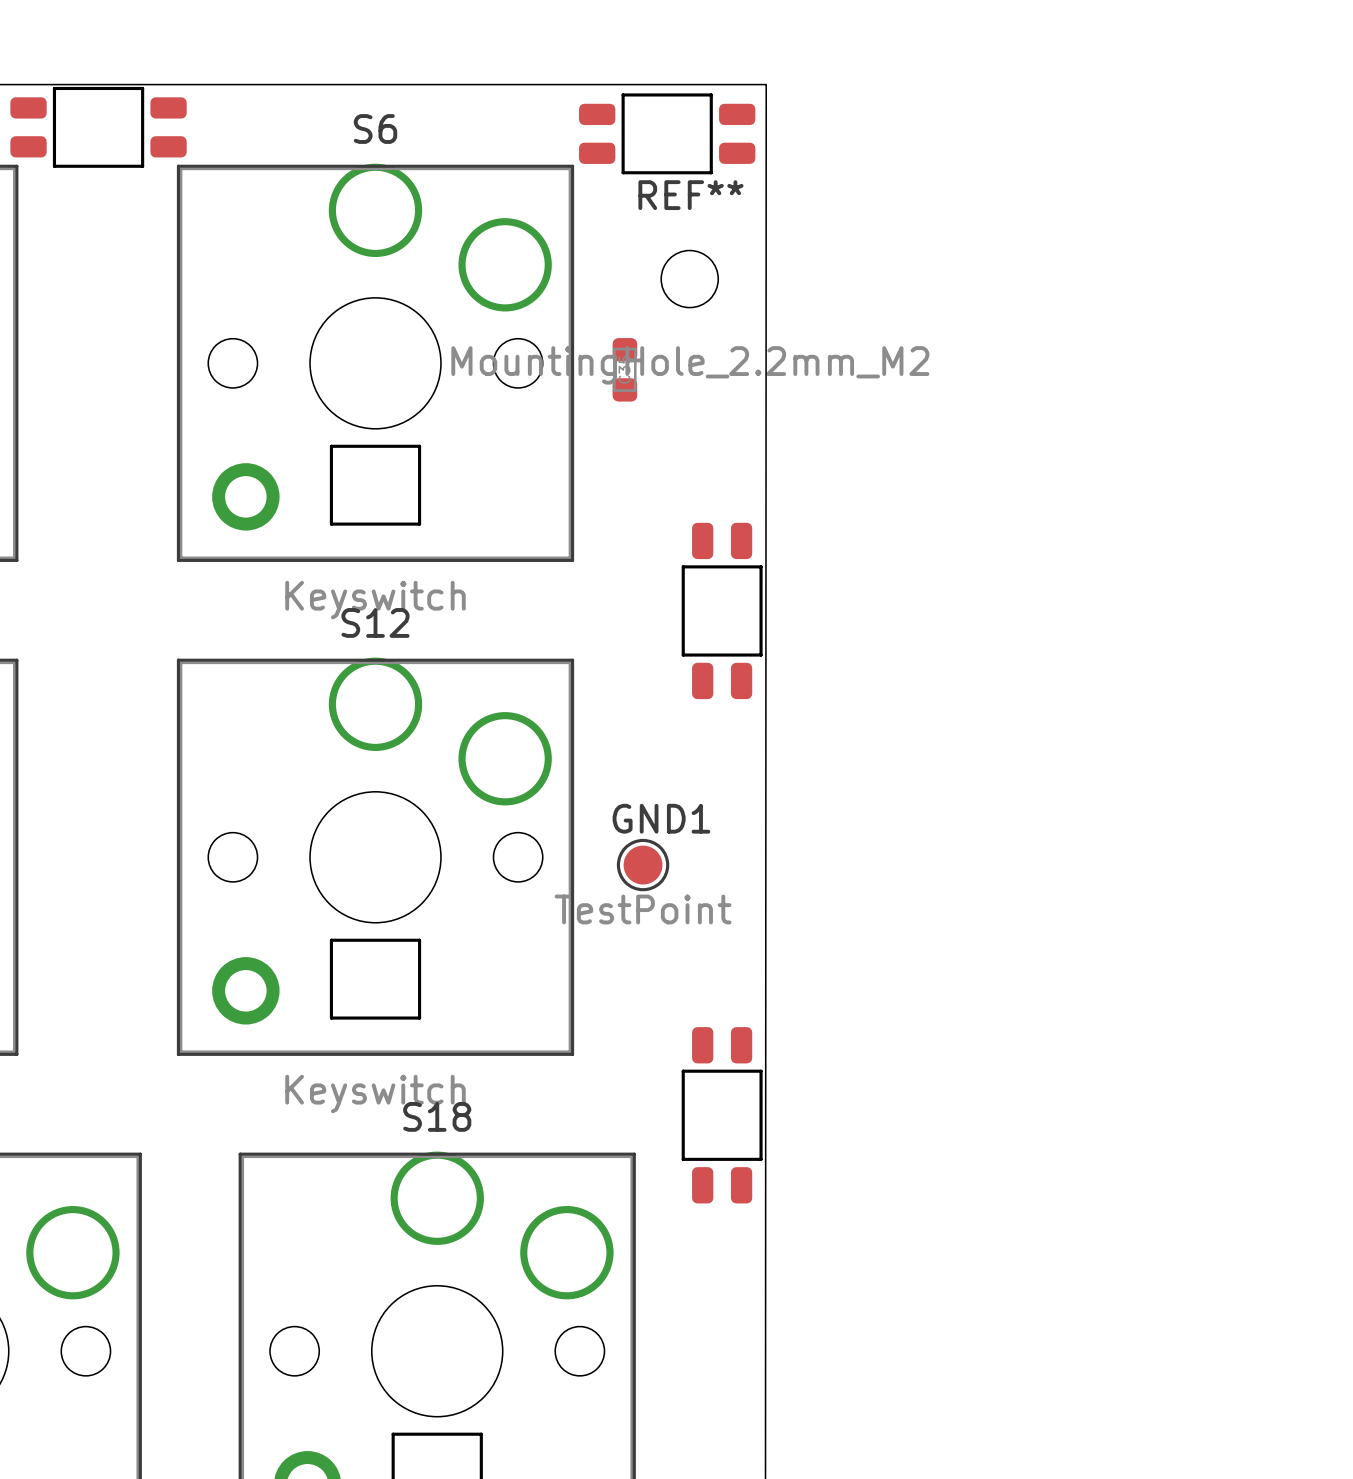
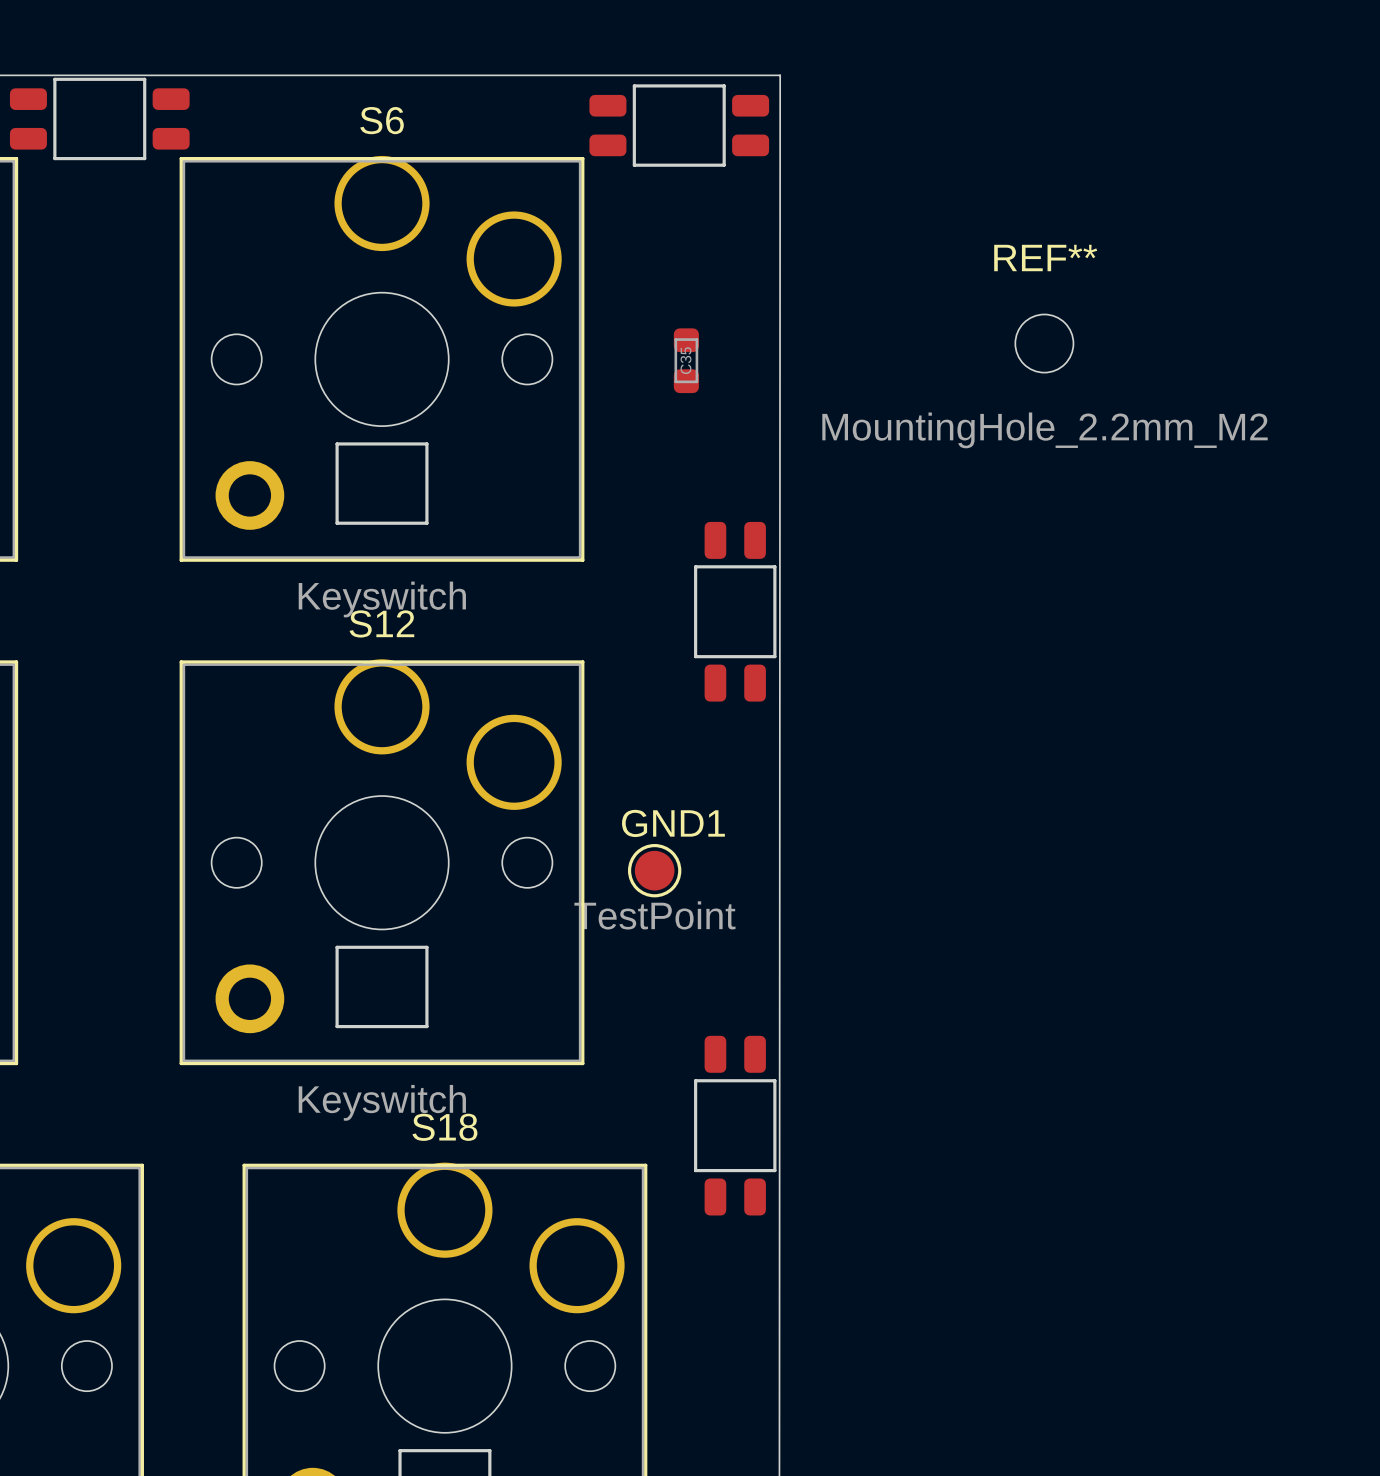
REF** position: (689, 279) -> (1044, 343)
C35 position: (624, 369) -> (686, 360)

